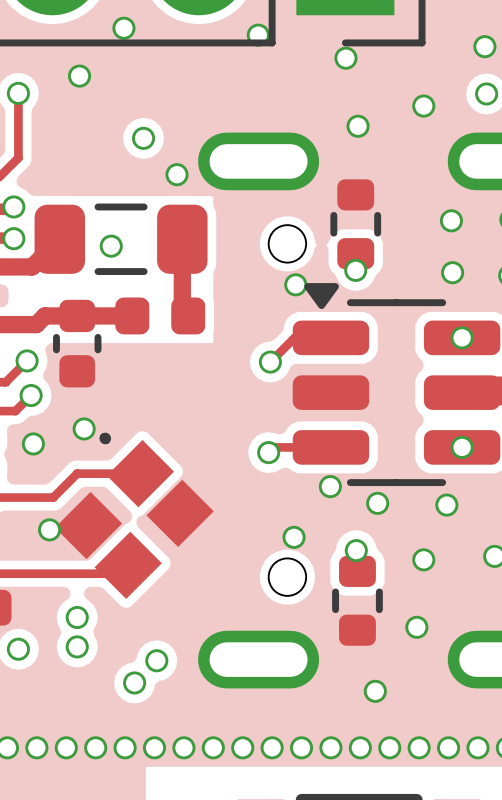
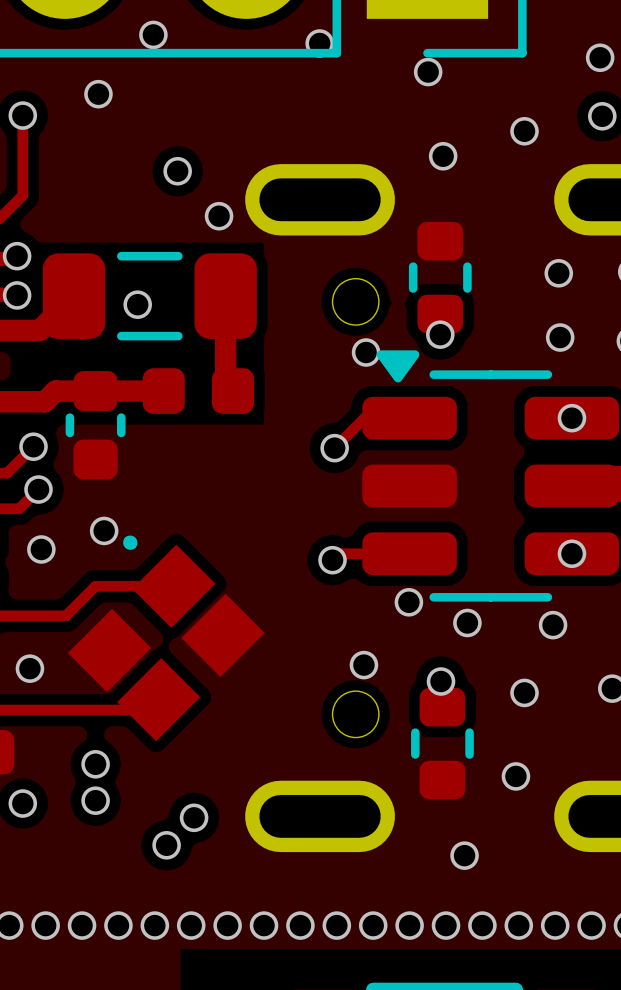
via: (49, 529) -> none
via: none -> (29, 668)

